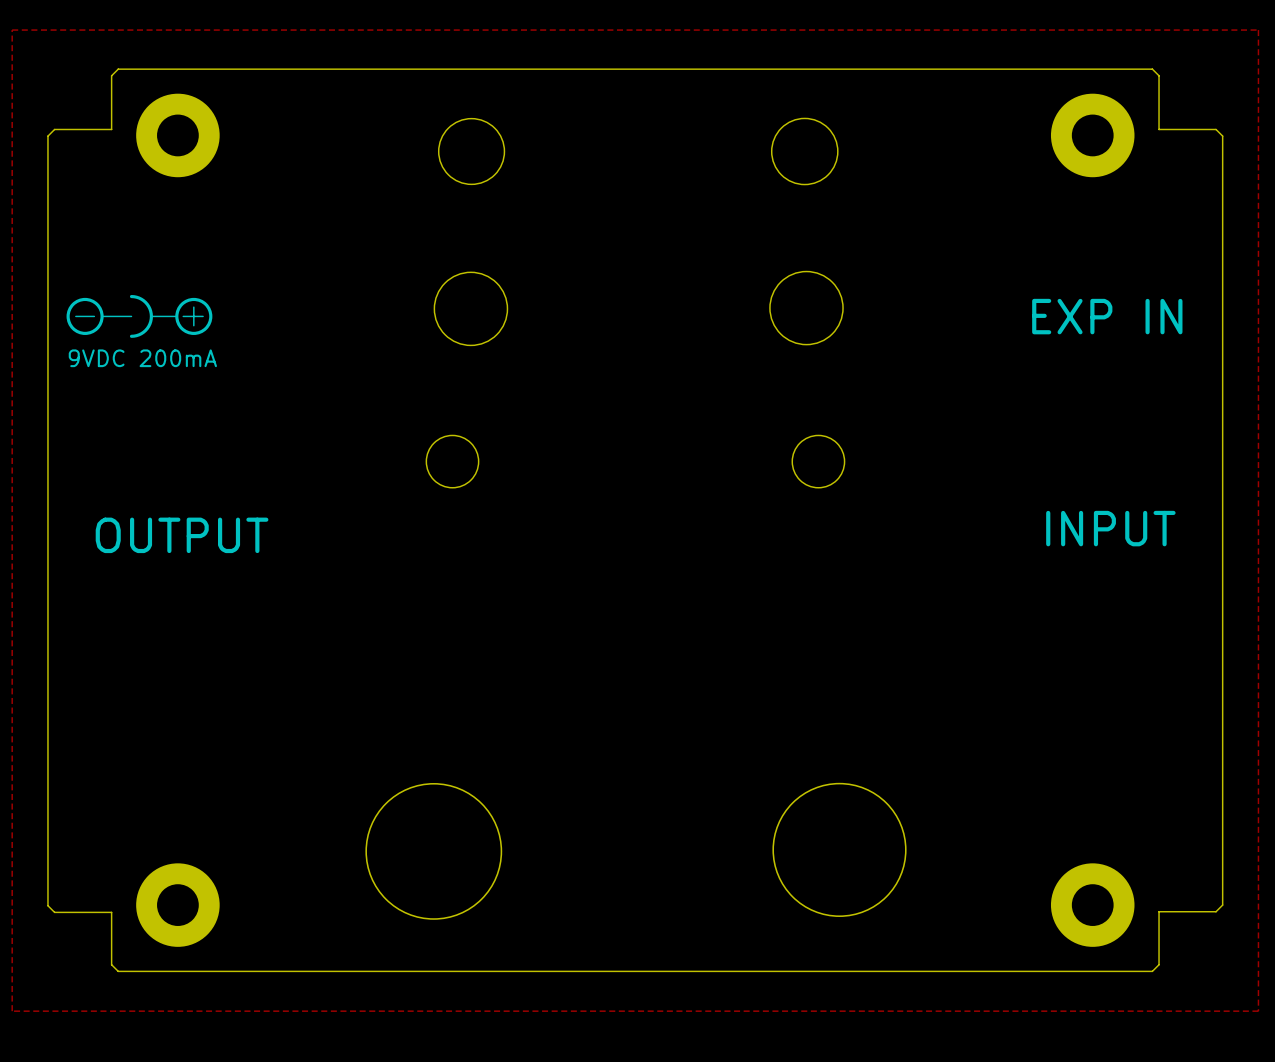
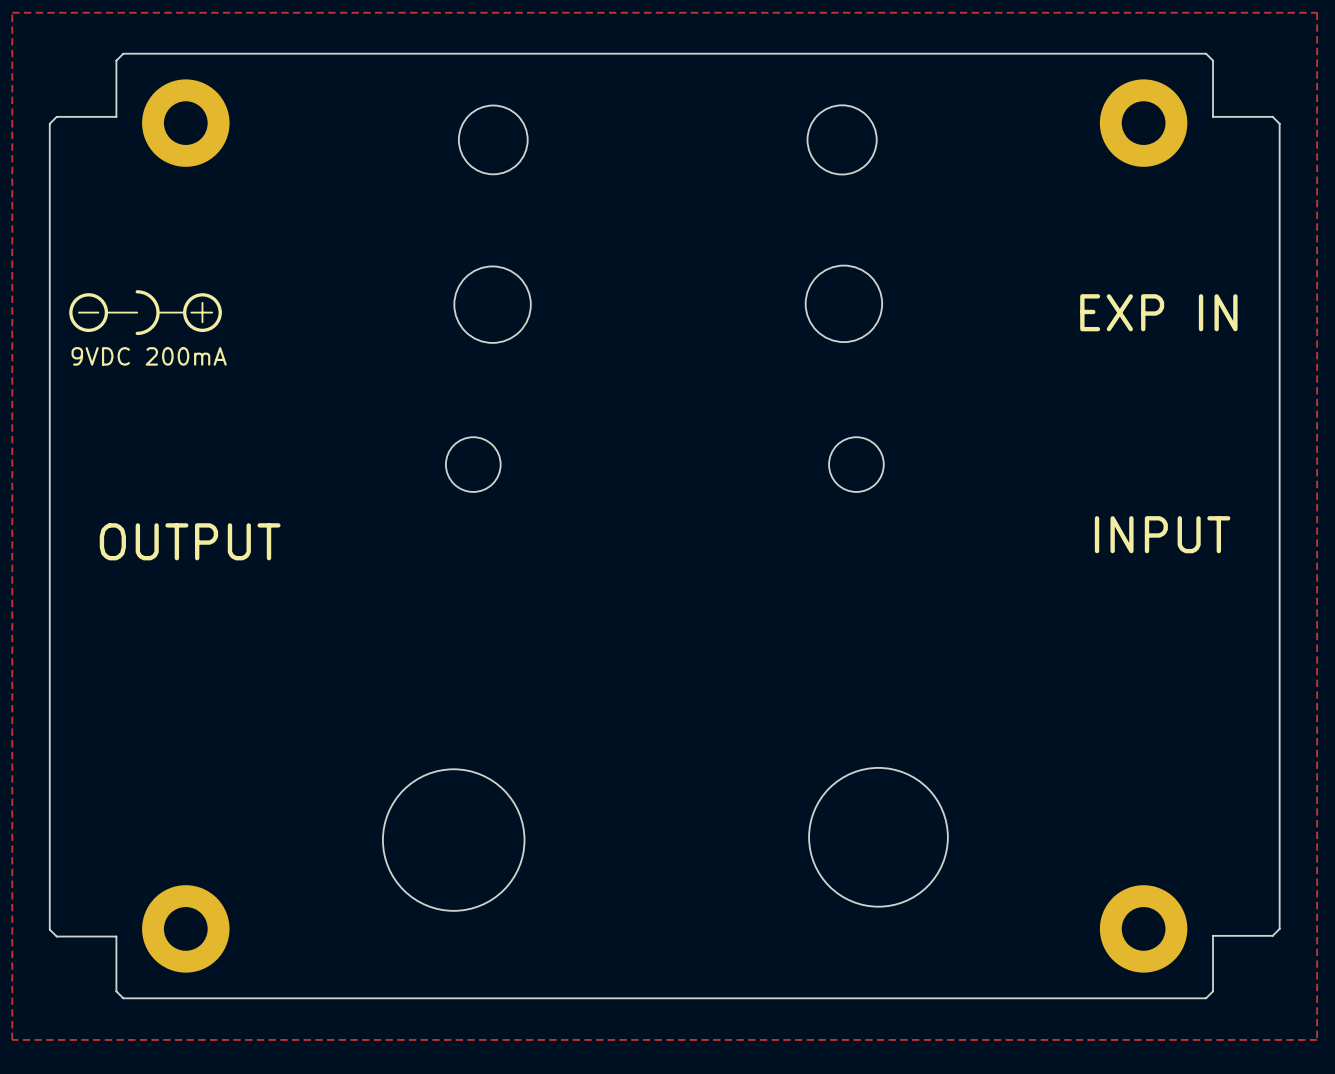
round board edge position: (839, 849) -> (878, 837)
round board edge position: (433, 851) -> (453, 840)

